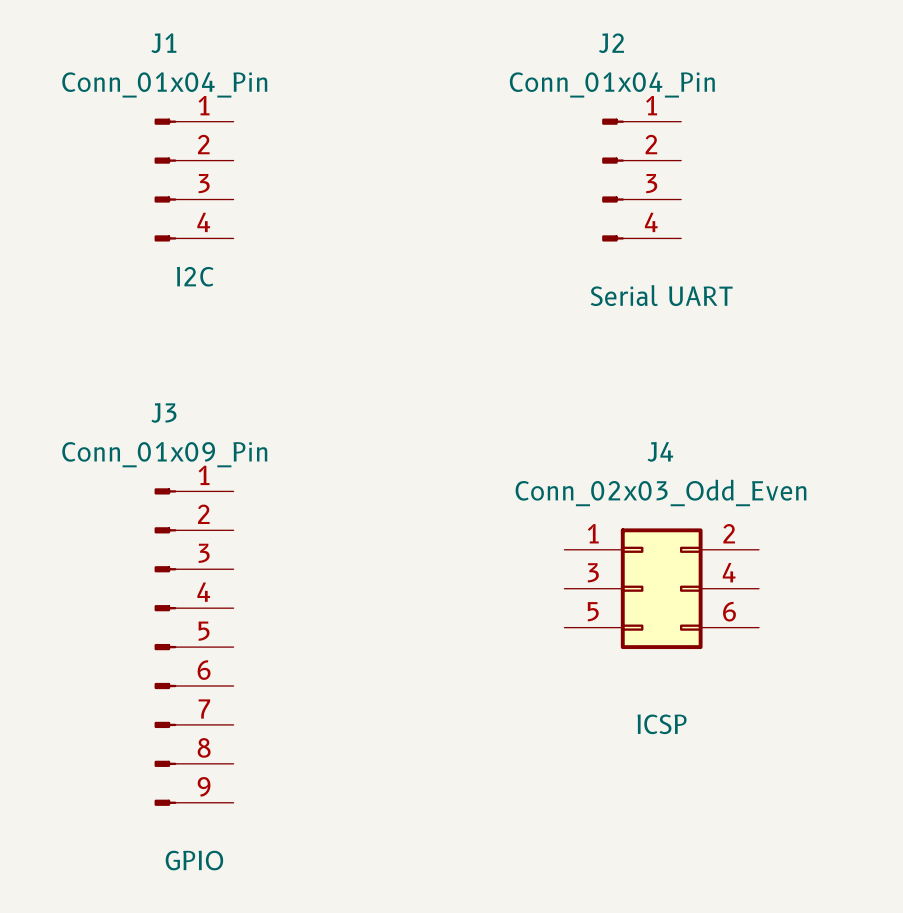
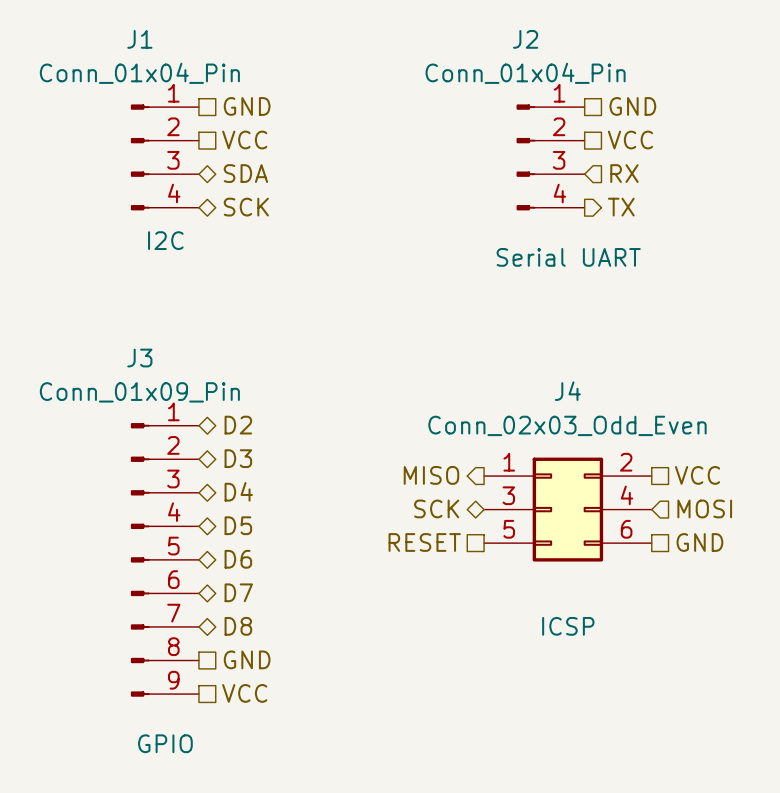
hierarchical label: none -> GND (247, 106)
hierarchical label: none -> GND (632, 106)
hierarchical label: none -> VCC (244, 140)
hierarchical label: none -> VCC (630, 140)
hierarchical label: none -> SDA (245, 173)
hierarchical label: none -> RX (624, 173)
hierarchical label: none -> SCK (246, 207)
hierarchical label: none -> TX (621, 207)
hierarchical label: none -> D2 (238, 425)
hierarchical label: none -> D3 (238, 458)
hierarchical label: none -> MISO (431, 475)
hierarchical label: none -> VCC (697, 475)
hierarchical label: none -> D4 (238, 491)
hierarchical label: none -> SCK (436, 508)
hierarchical label: none -> MOSI (704, 508)
hierarchical label: none -> D5 (238, 525)
hierarchical label: none -> RESET (424, 542)
hierarchical label: none -> GND (699, 542)
hierarchical label: none -> D6 (238, 559)
hierarchical label: none -> D7 (238, 592)
hierarchical label: none -> D8 (238, 626)
hierarchical label: none -> GND (247, 659)
hierarchical label: none -> VCC (244, 693)

